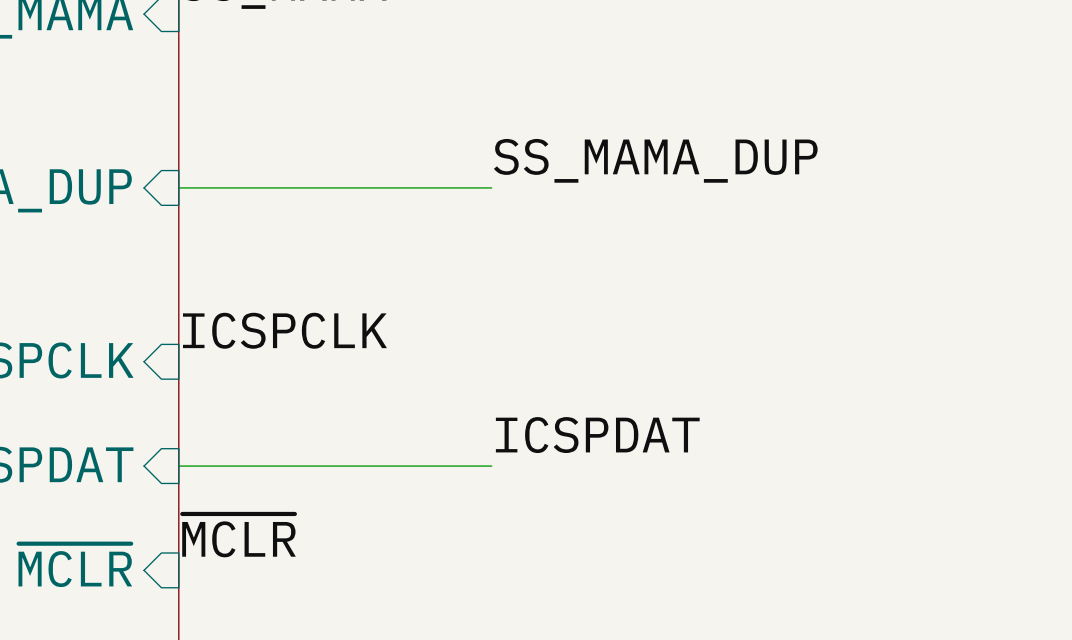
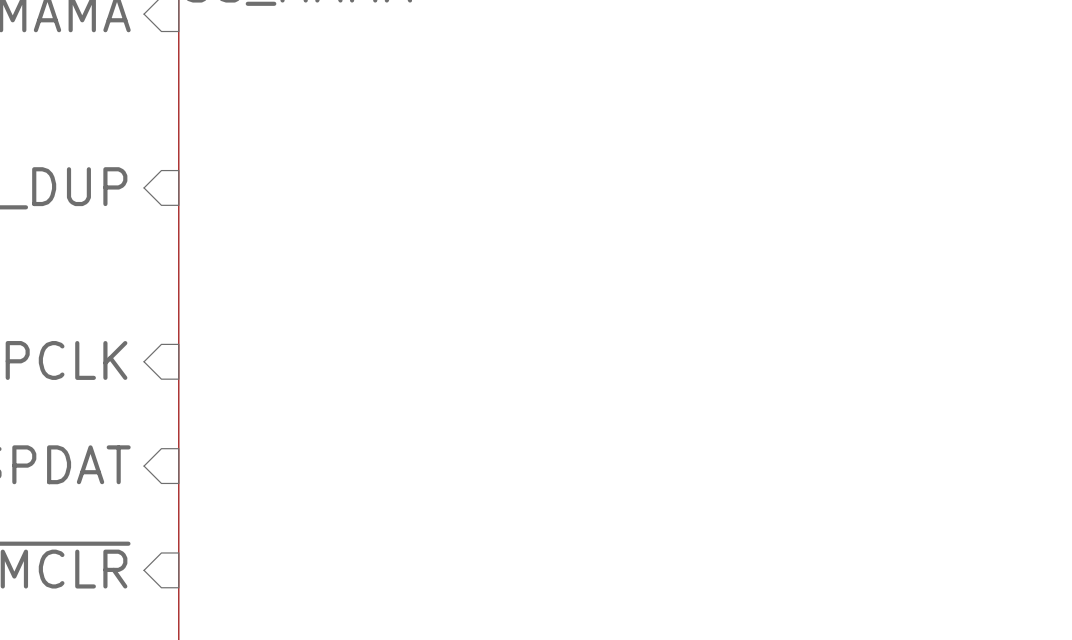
label: SS_MAMA_DUP (655, 160) -> none
wire: (178, 187) (491, 187) -> none
label: ICSPCLK (284, 330) -> none
label: ICSPDAT (597, 435) -> none
wire: (178, 466) (491, 466) -> none
label: ~{MCLR} (239, 535) -> none

